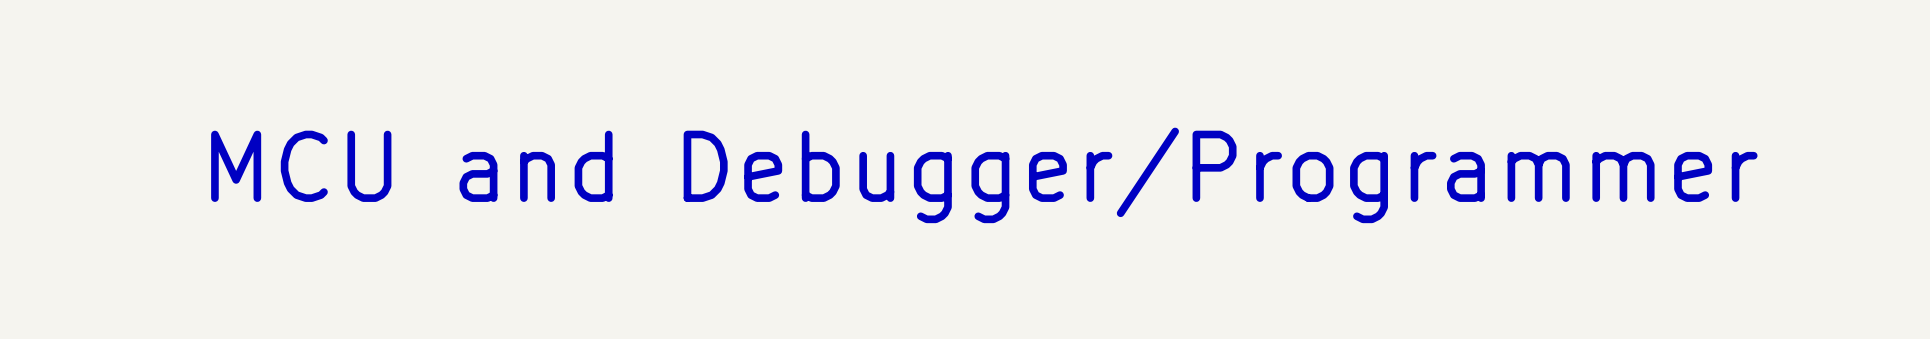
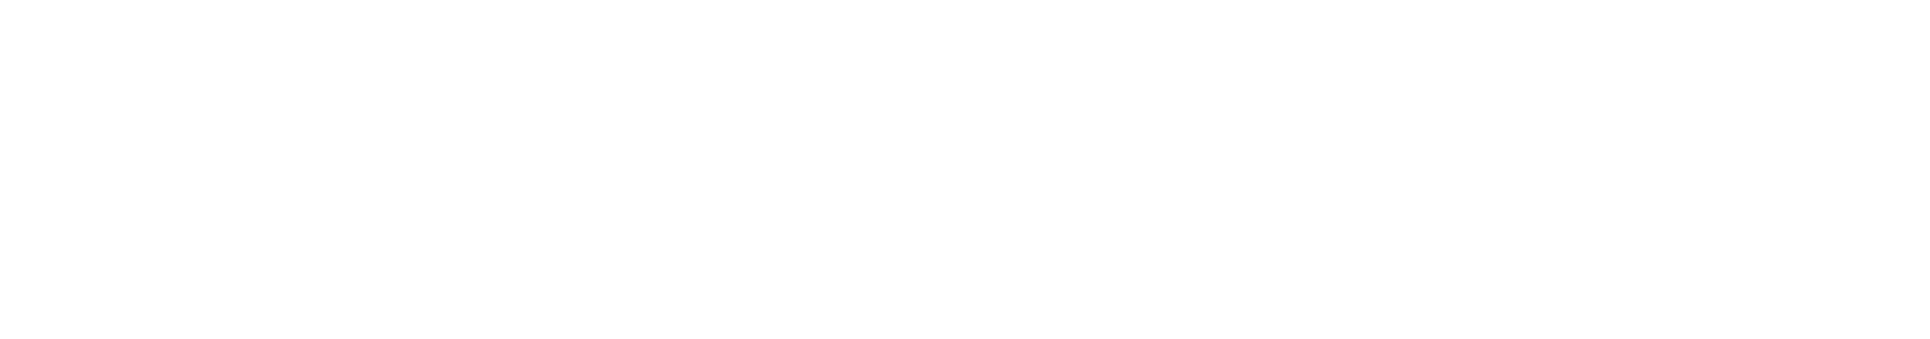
text: MCU and Debugger/Programmer (984, 175) -> none

